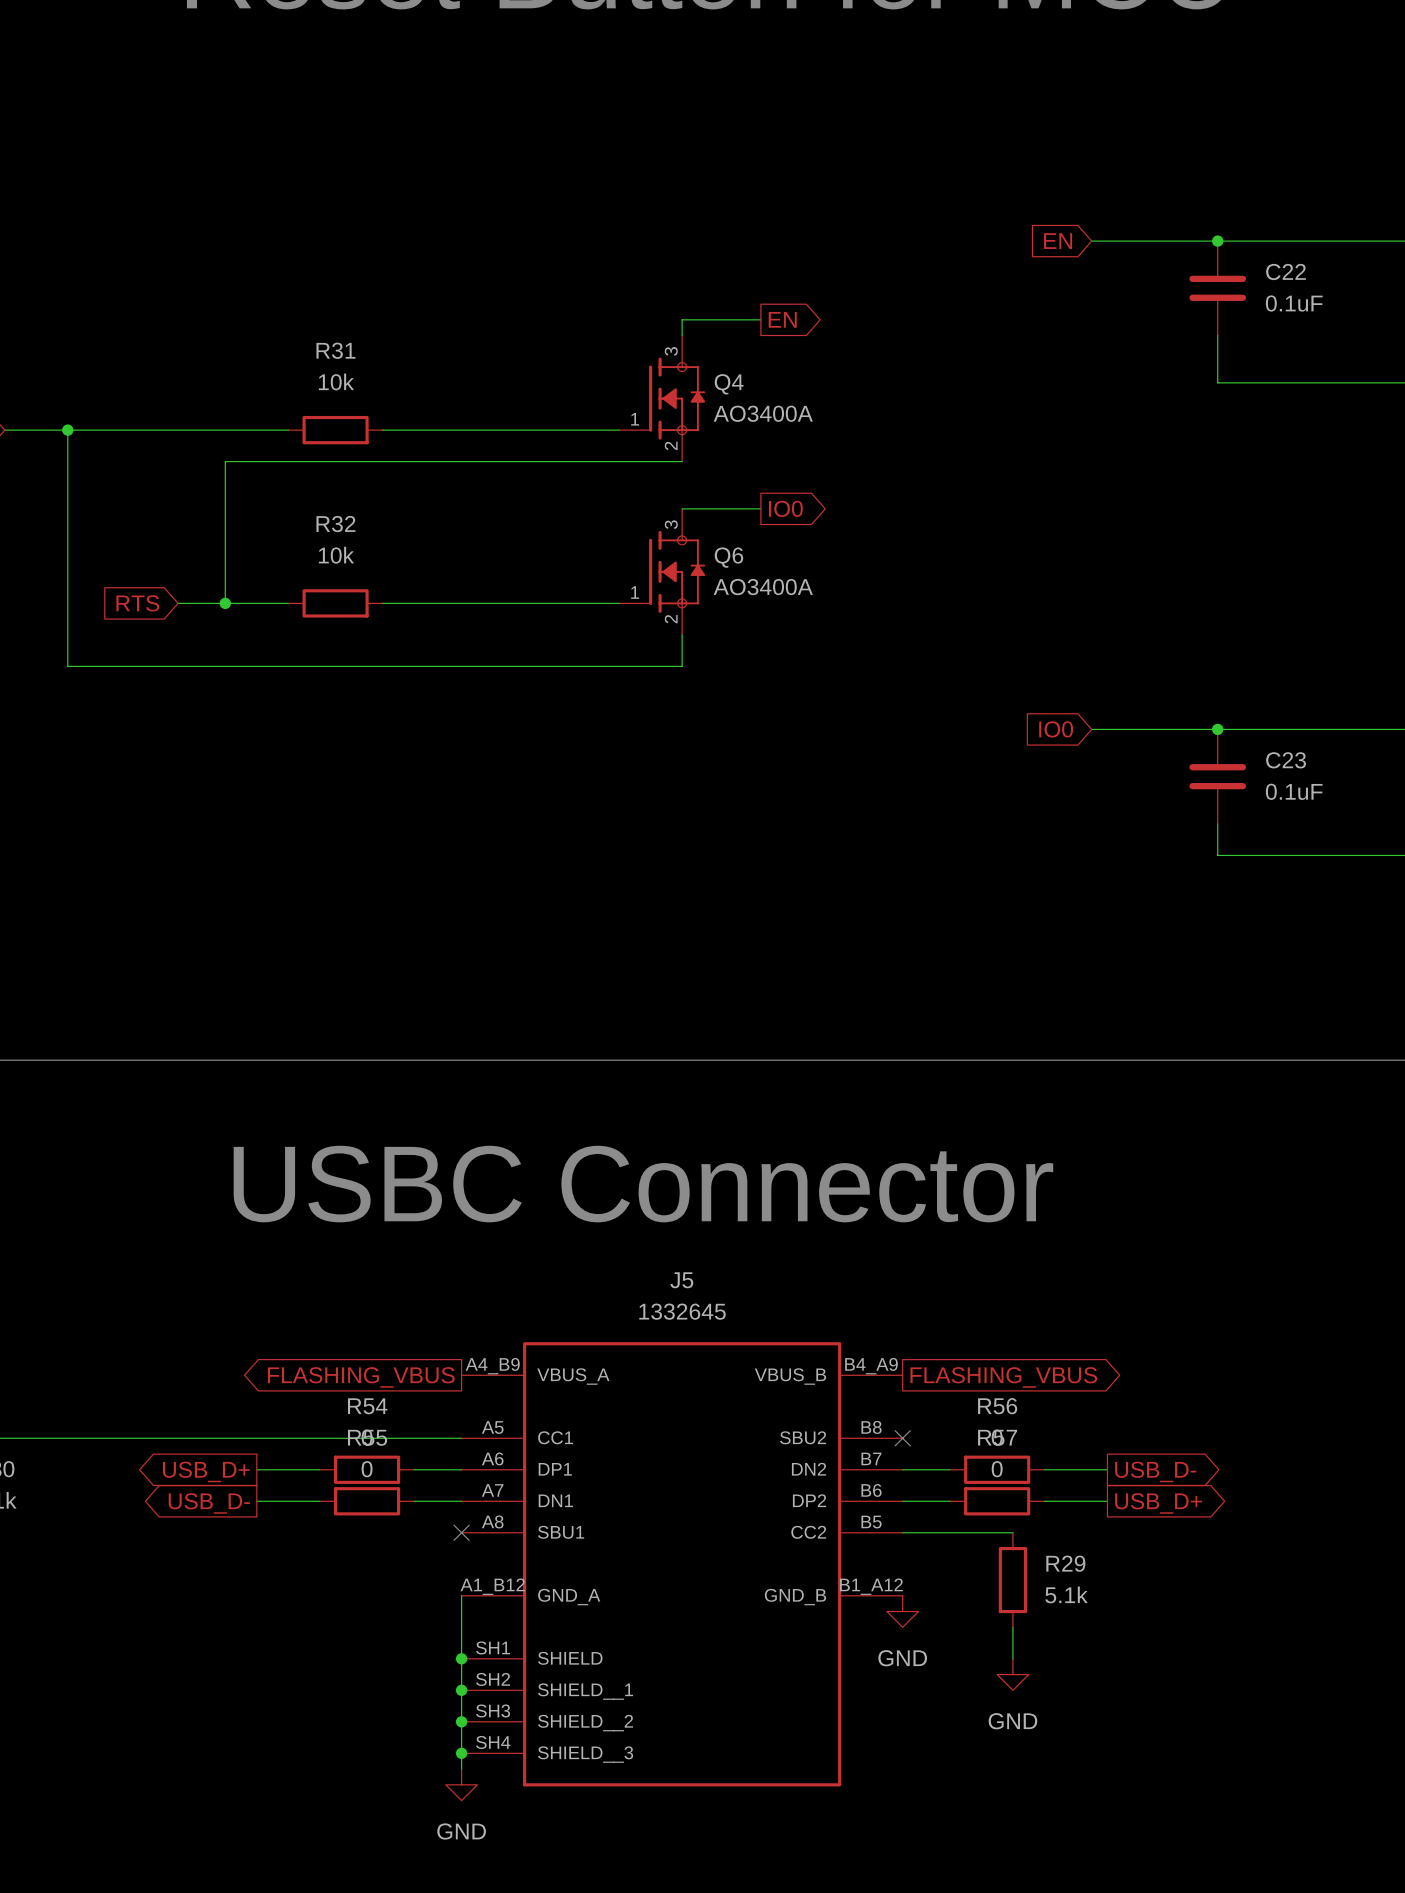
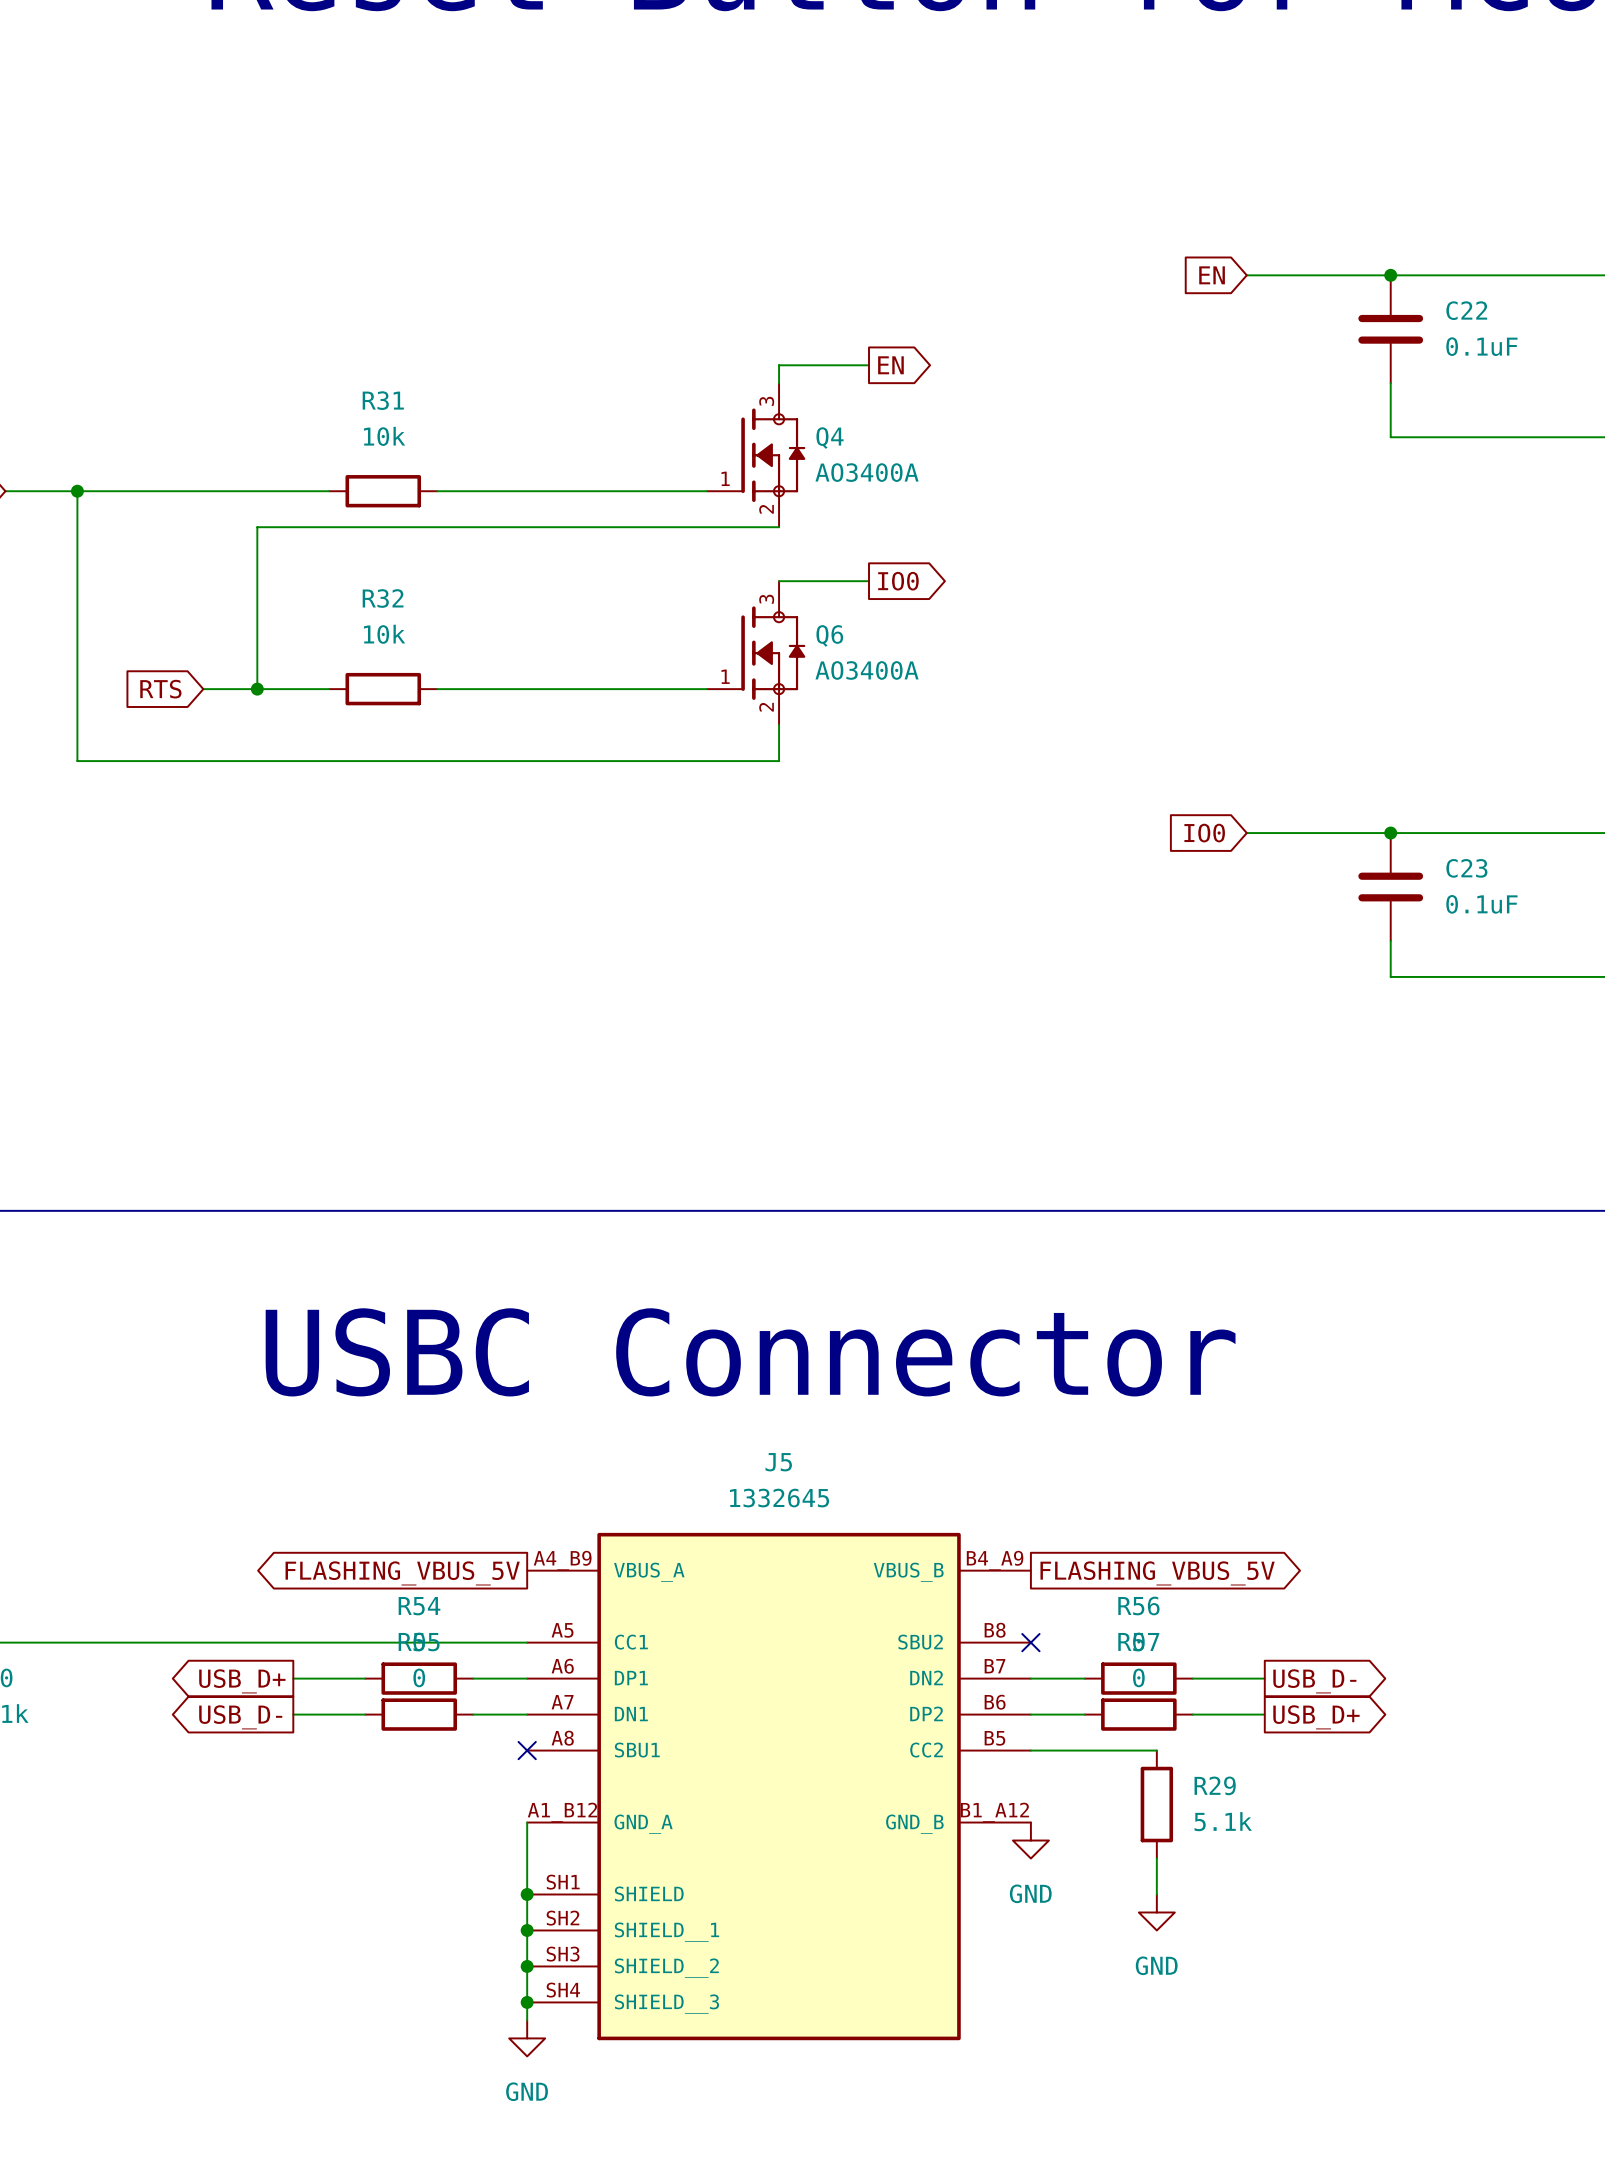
global label: FLASHING_VBUS (361, 1377) -> FLASHING_VBUS_5V (402, 1573)
global label: FLASHING_VBUS (1003, 1377) -> FLASHING_VBUS_5V (1157, 1573)

